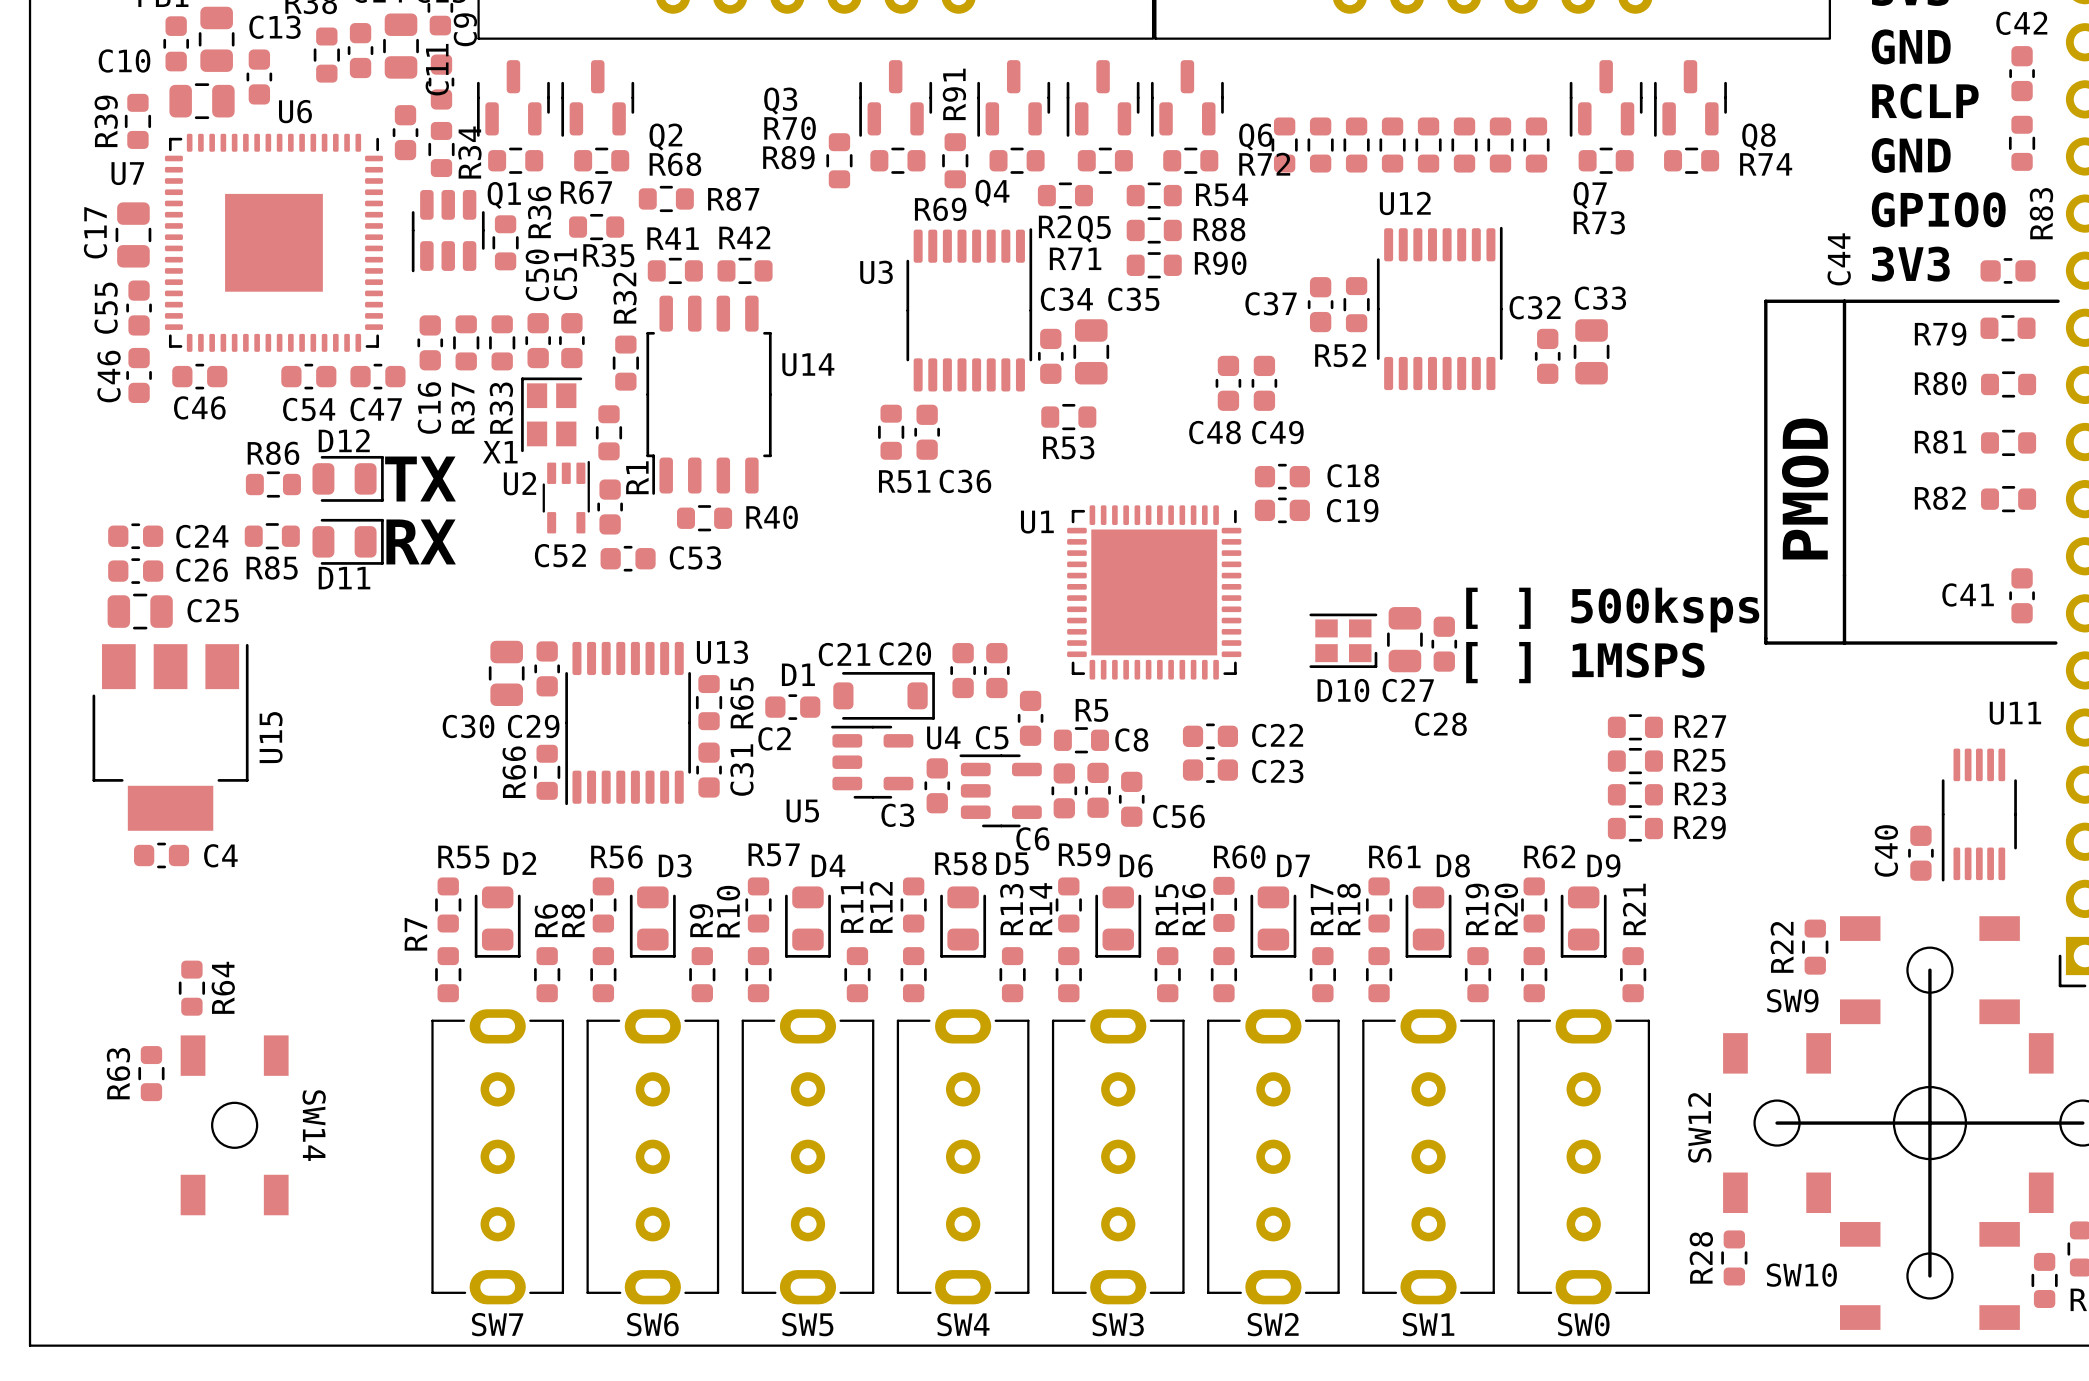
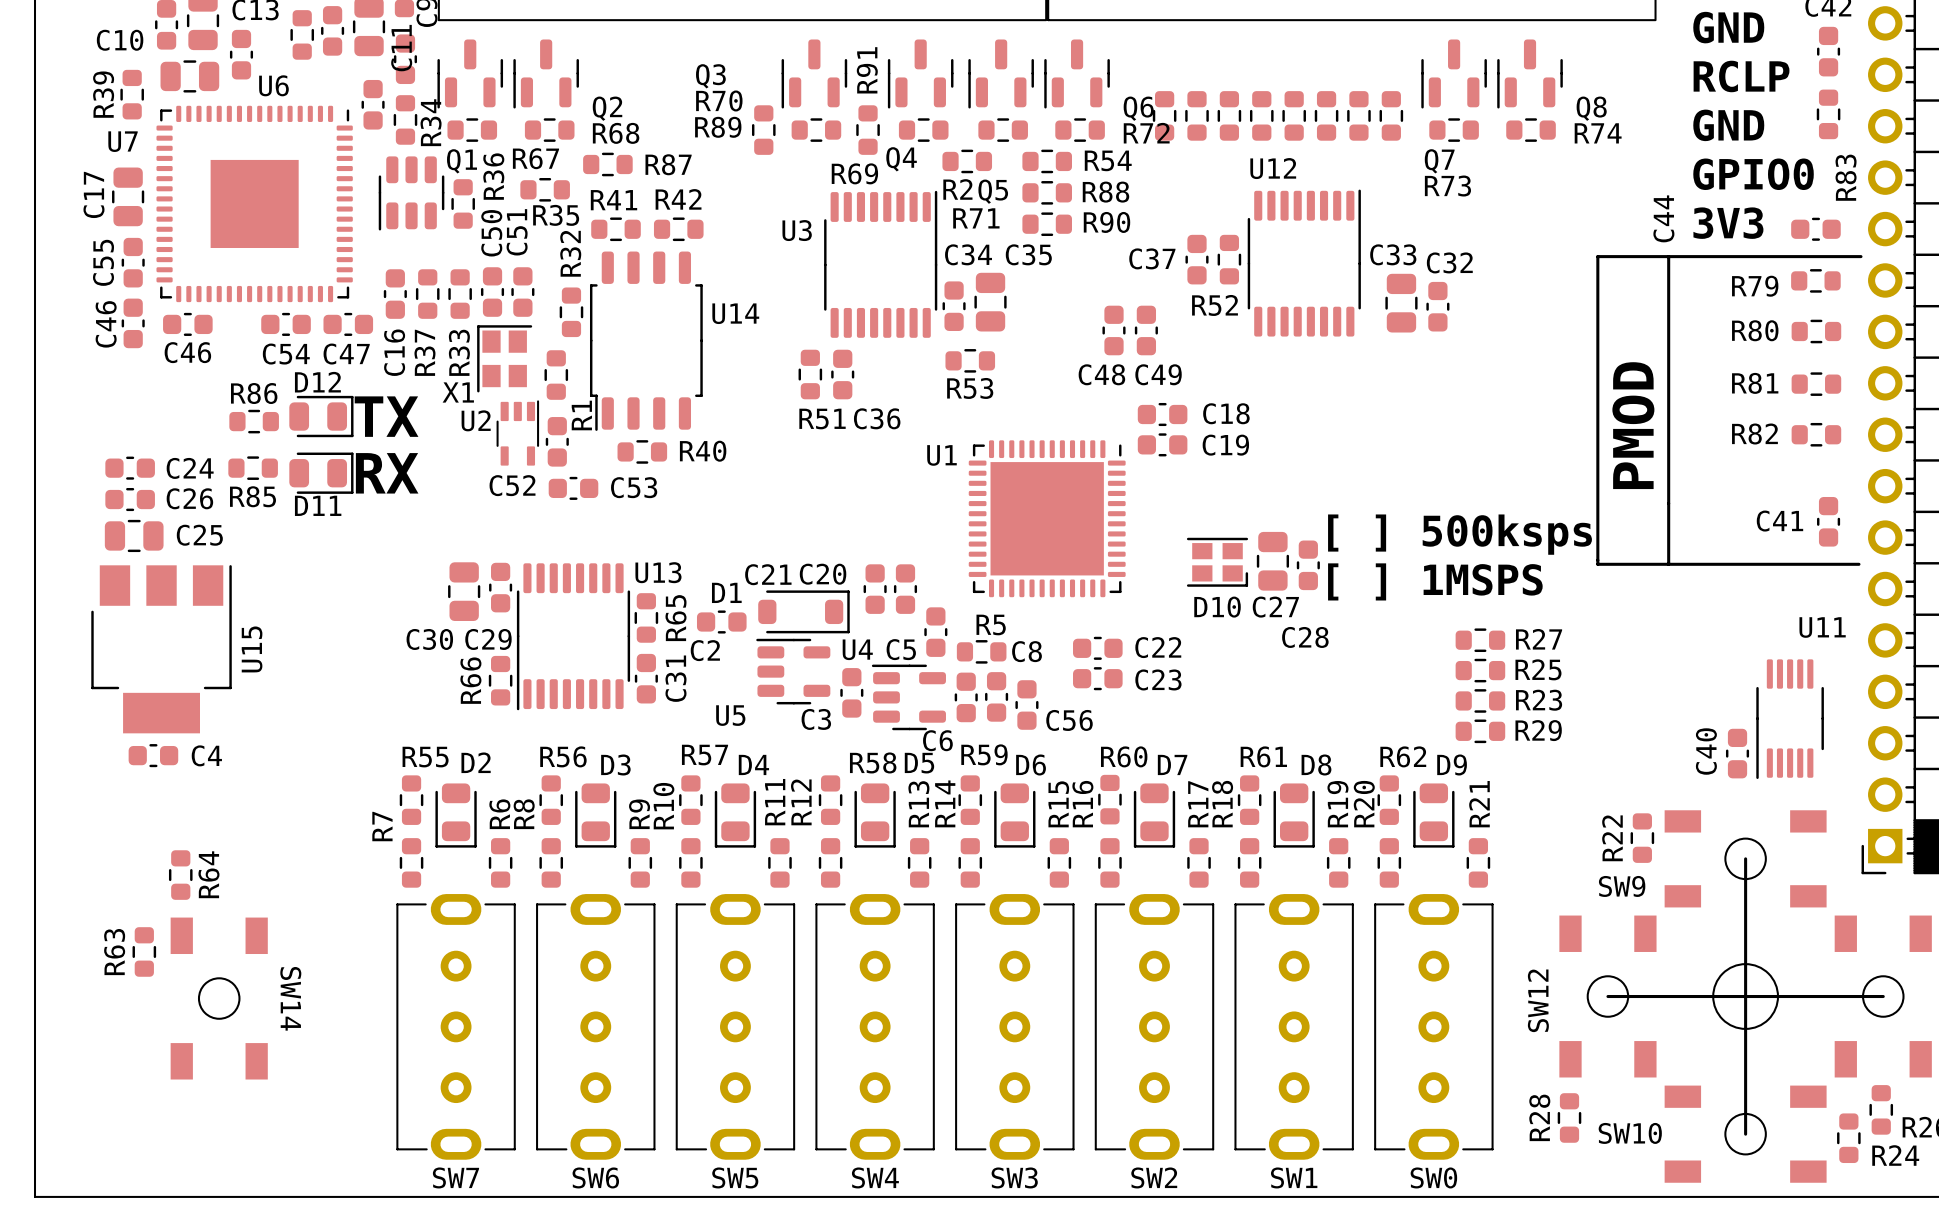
C33 name position: C33 (1600, 298) -> C33 (1393, 254)
C32 name position: C32 (1535, 307) -> C32 (1449, 262)
C33 position: (1591, 351) -> (1401, 303)
C32 position: (1547, 356) -> (1437, 306)

